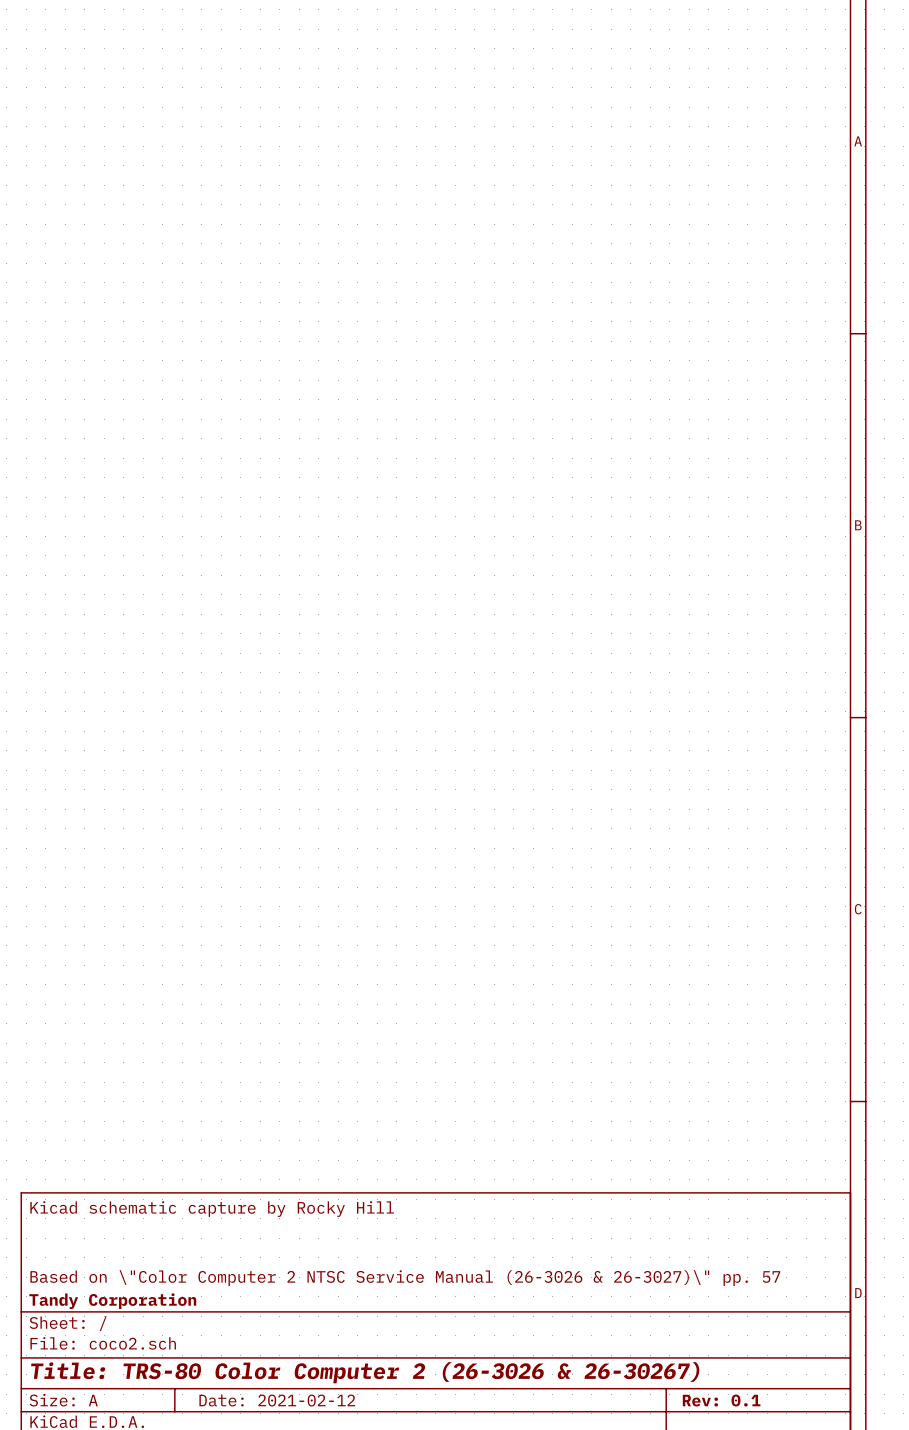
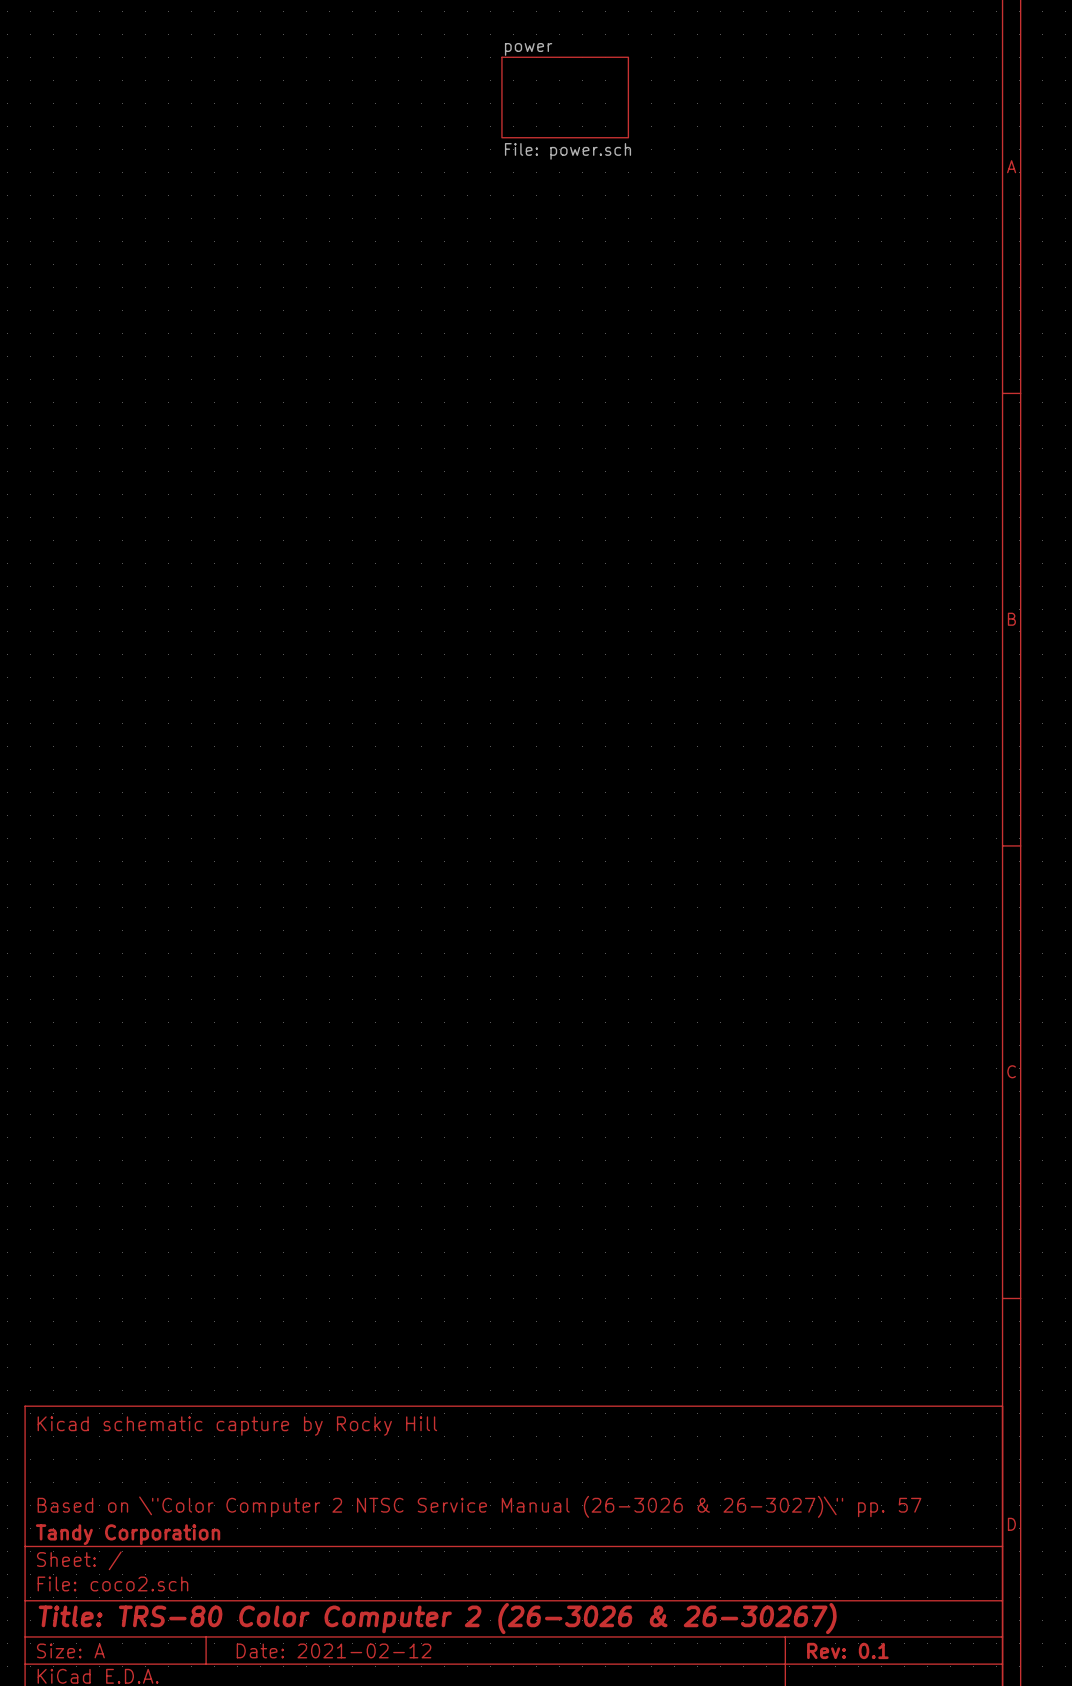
sheet power: none -> File: power.sch (565, 97)

